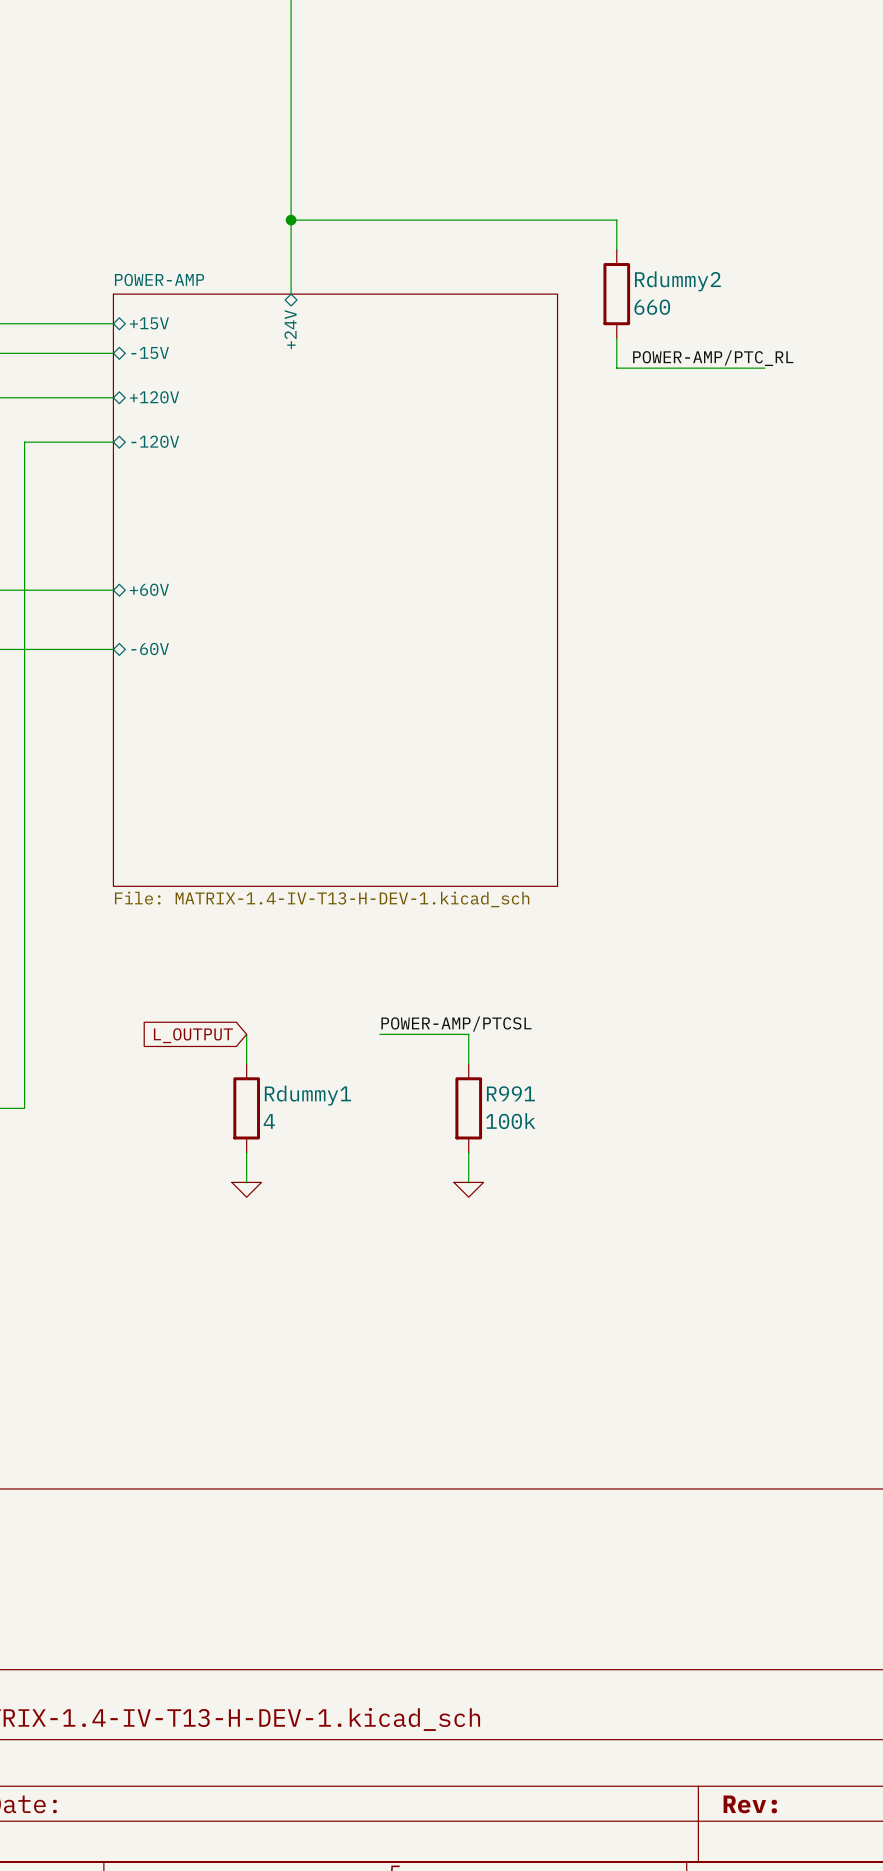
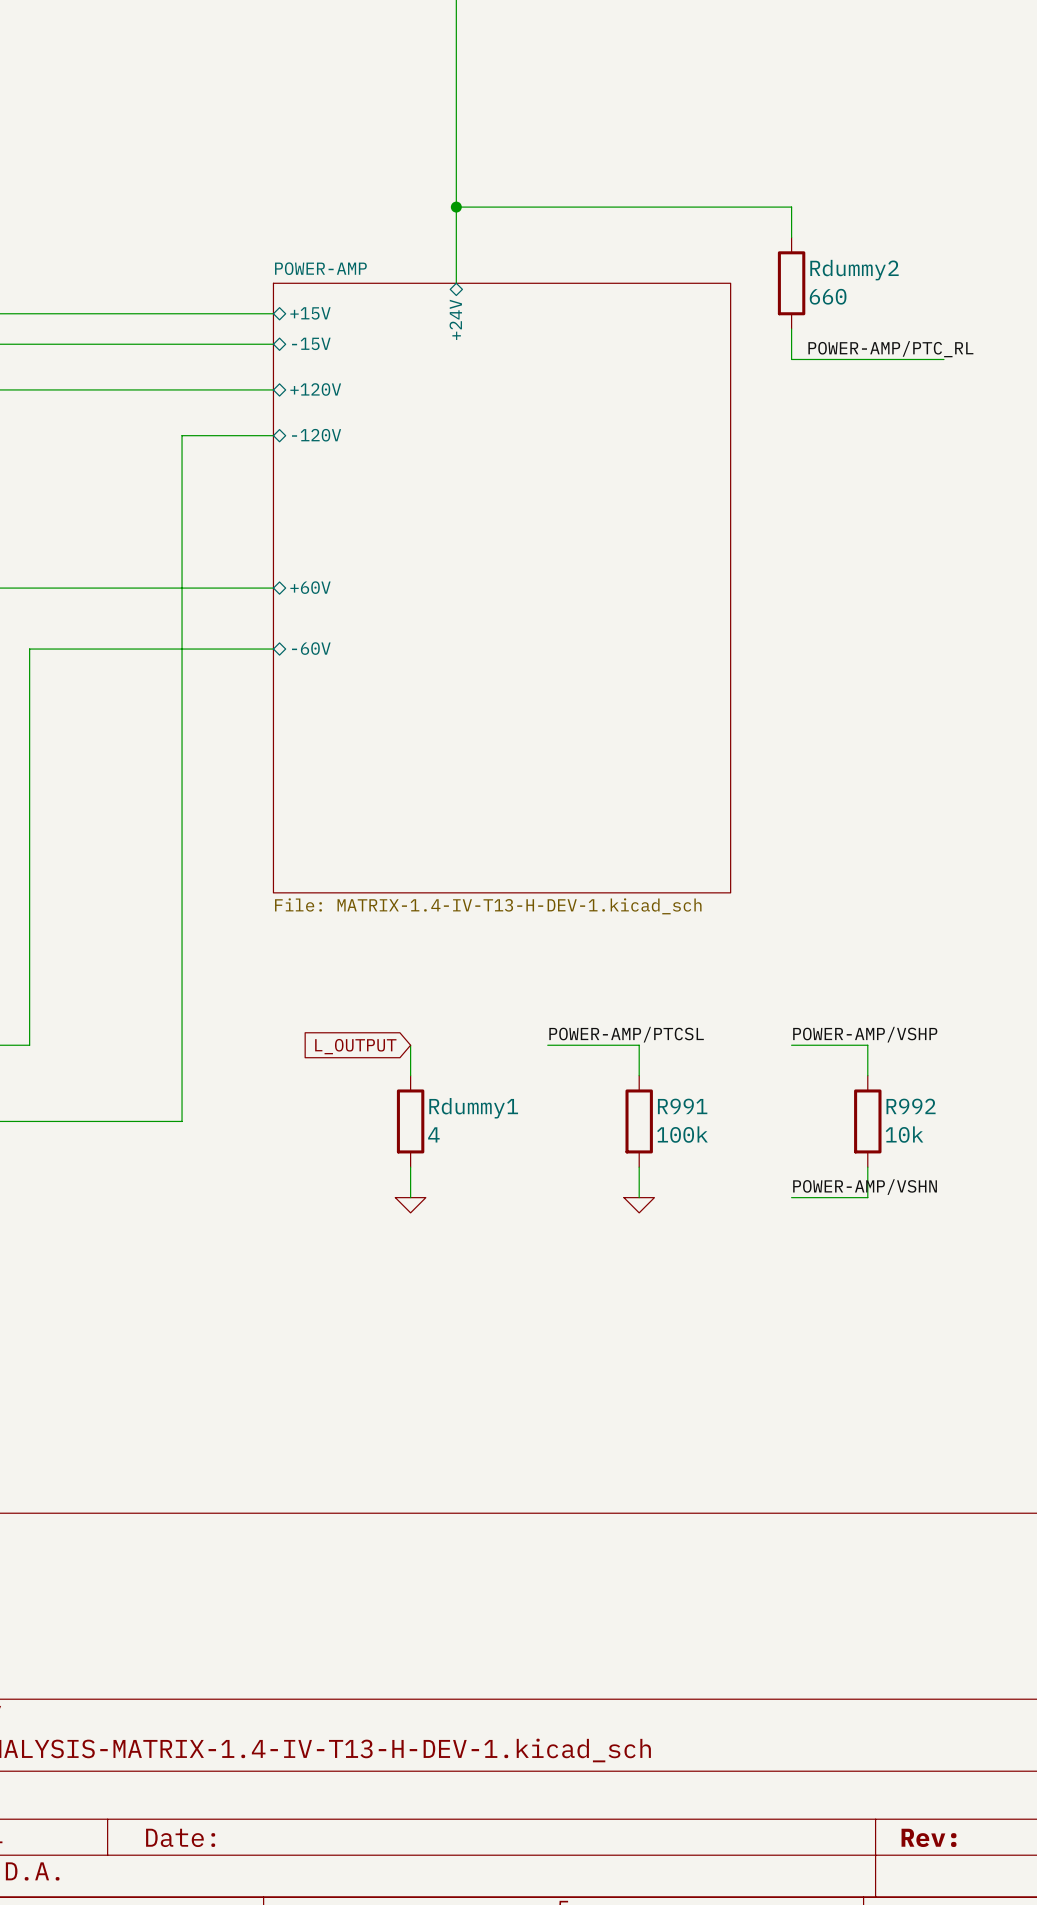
label: none -> POWER-AMP/VSHP (865, 1034)
wire: none -> (791, 1045) (867, 1045) (867, 1075)
R992: none -> 10k (867, 1121)
wire: none -> (867, 1167) (867, 1197) (791, 1197)
label: none -> POWER-AMP/VSHN (865, 1187)

